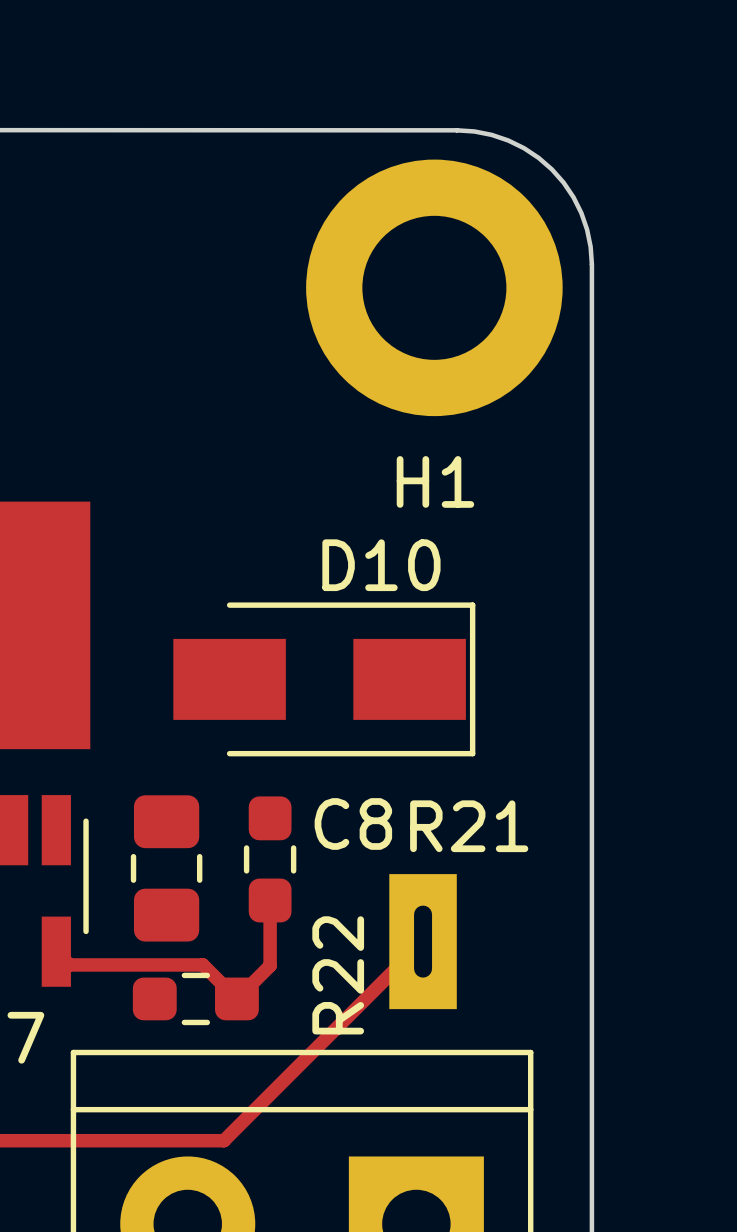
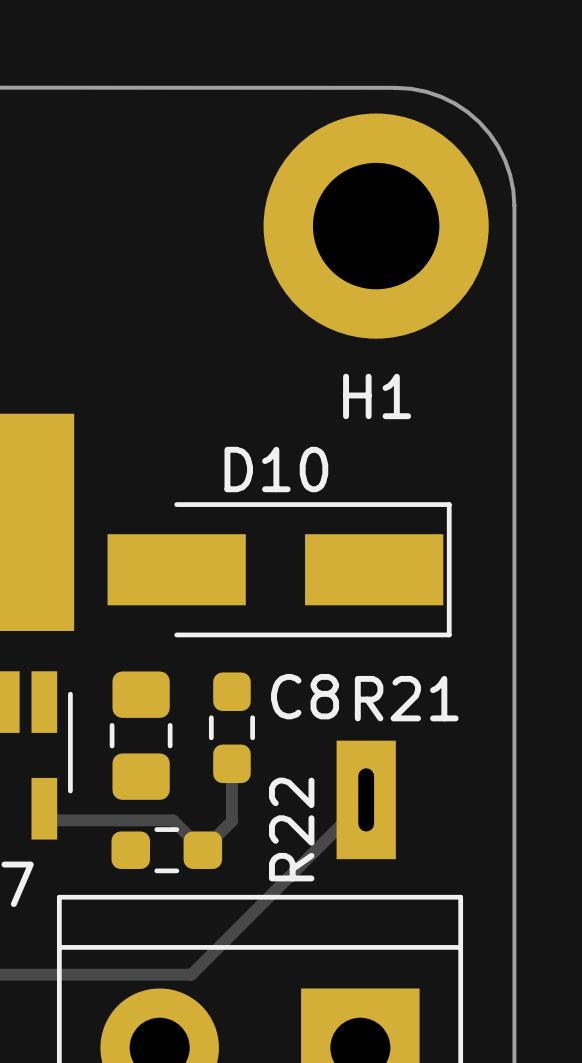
D10 name position: D10 (381, 565) -> D10 (276, 469)
D10 footprint: [173, 602, 476, 757] -> [107, 502, 452, 638]

